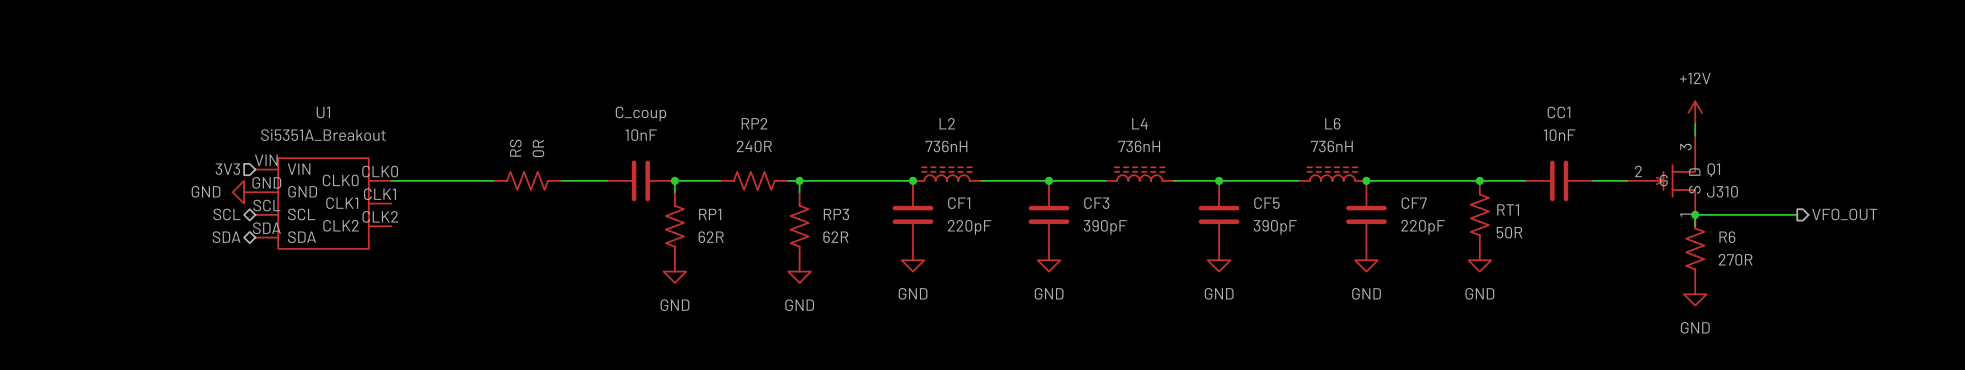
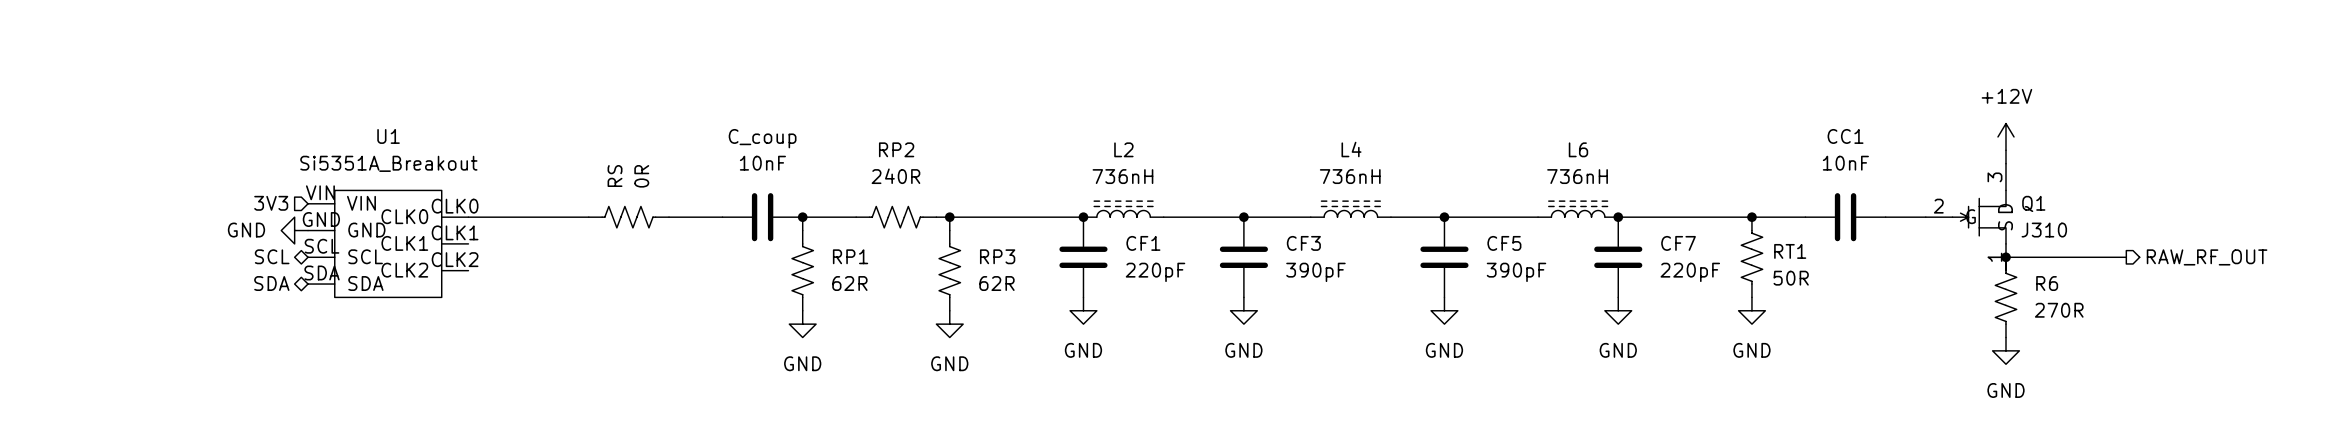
hierarchical label: VFO_OUT (1844, 214) -> RAW_RF_OUT (2207, 257)

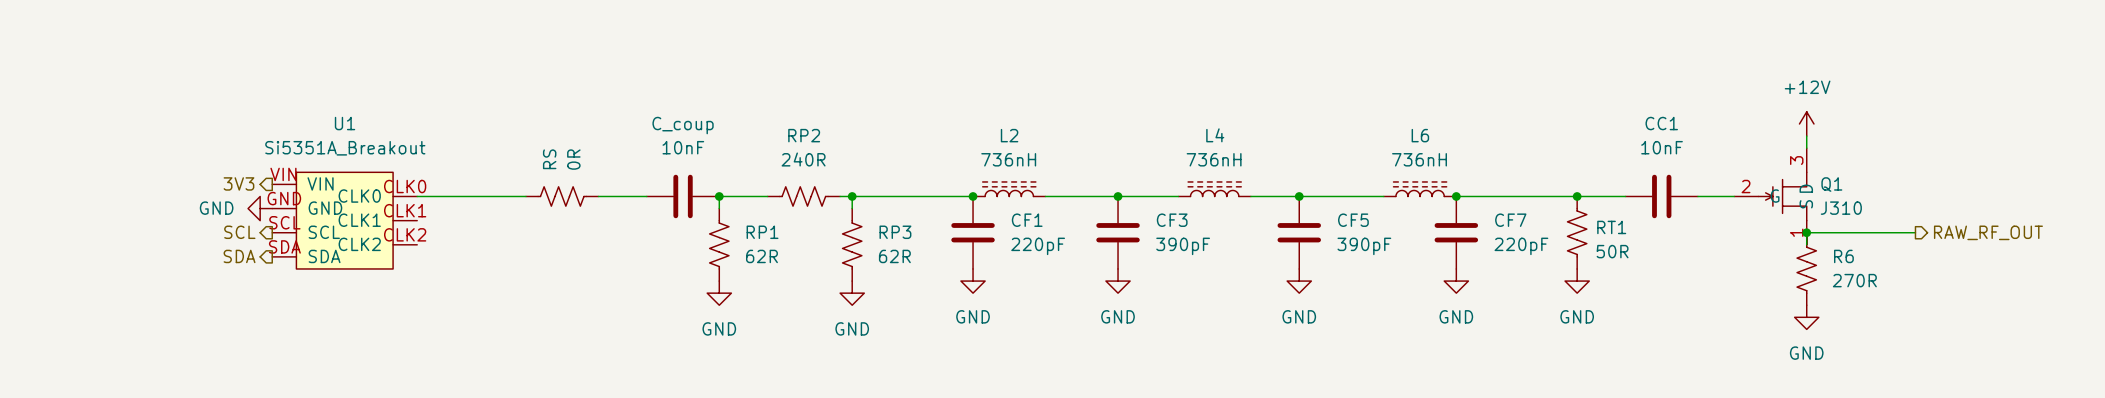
hierarchical label shape: input (271, 203) -> output (238, 183)
hierarchical label shape: bidirectional (272, 256) -> output (239, 232)
hierarchical label shape: bidirectional (271, 283) -> output (239, 256)

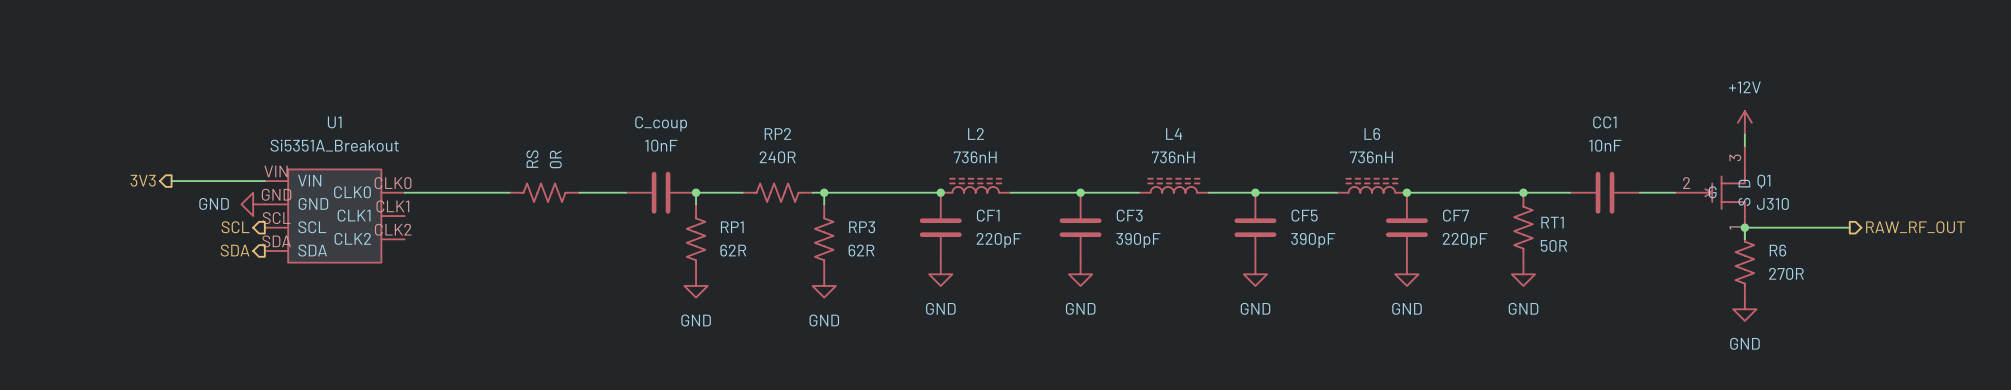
hierarchical label position: 3V3 (238, 183) -> 3V3 (143, 180)
wire: none -> (171, 181) (264, 181)

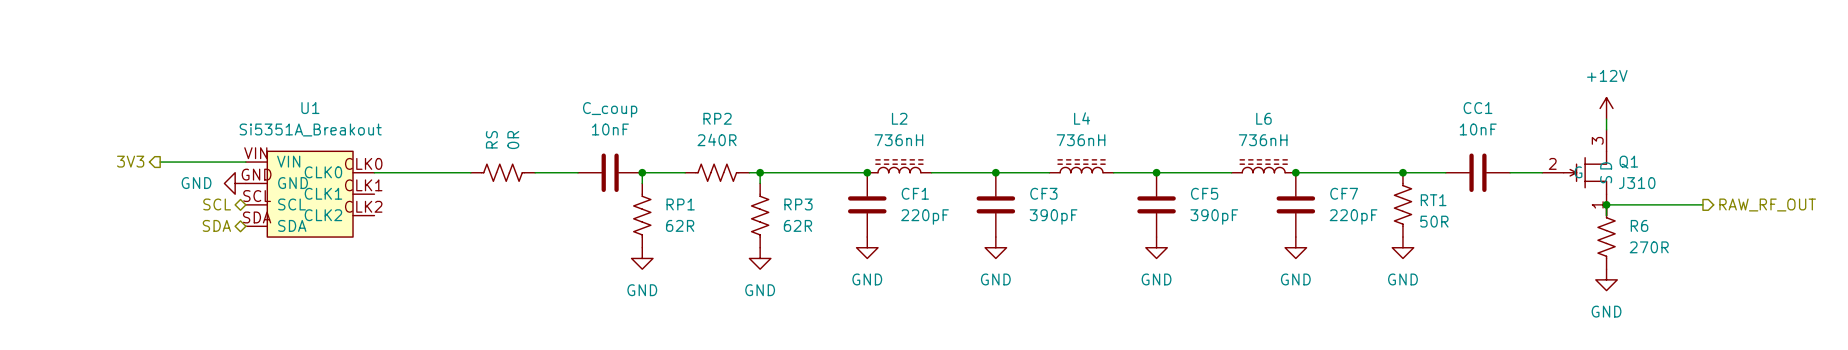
hierarchical label shape: output (235, 227) -> bidirectional (217, 204)
hierarchical label shape: output (235, 250) -> bidirectional (216, 225)

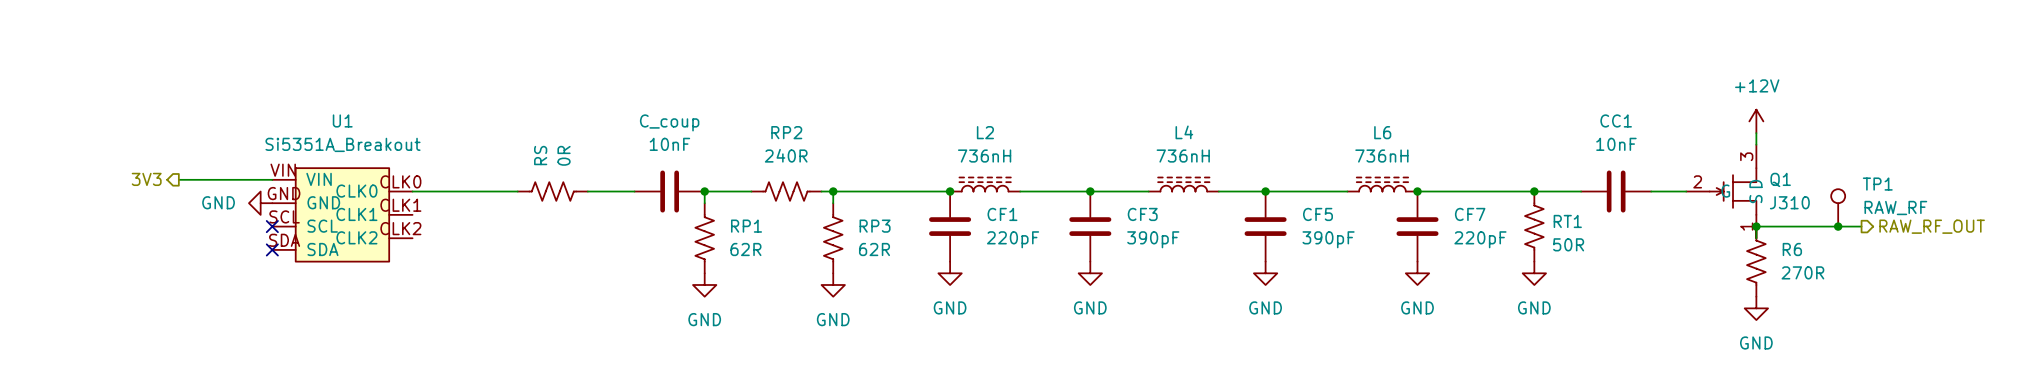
TP1: none -> RAW_RF (1838, 207)
hierarchical label: SCL (217, 204) -> none
no-connect mark: none -> (272, 226)
junction: none -> (1838, 226)
hierarchical label: SDA (216, 225) -> none
no-connect mark: none -> (272, 249)

